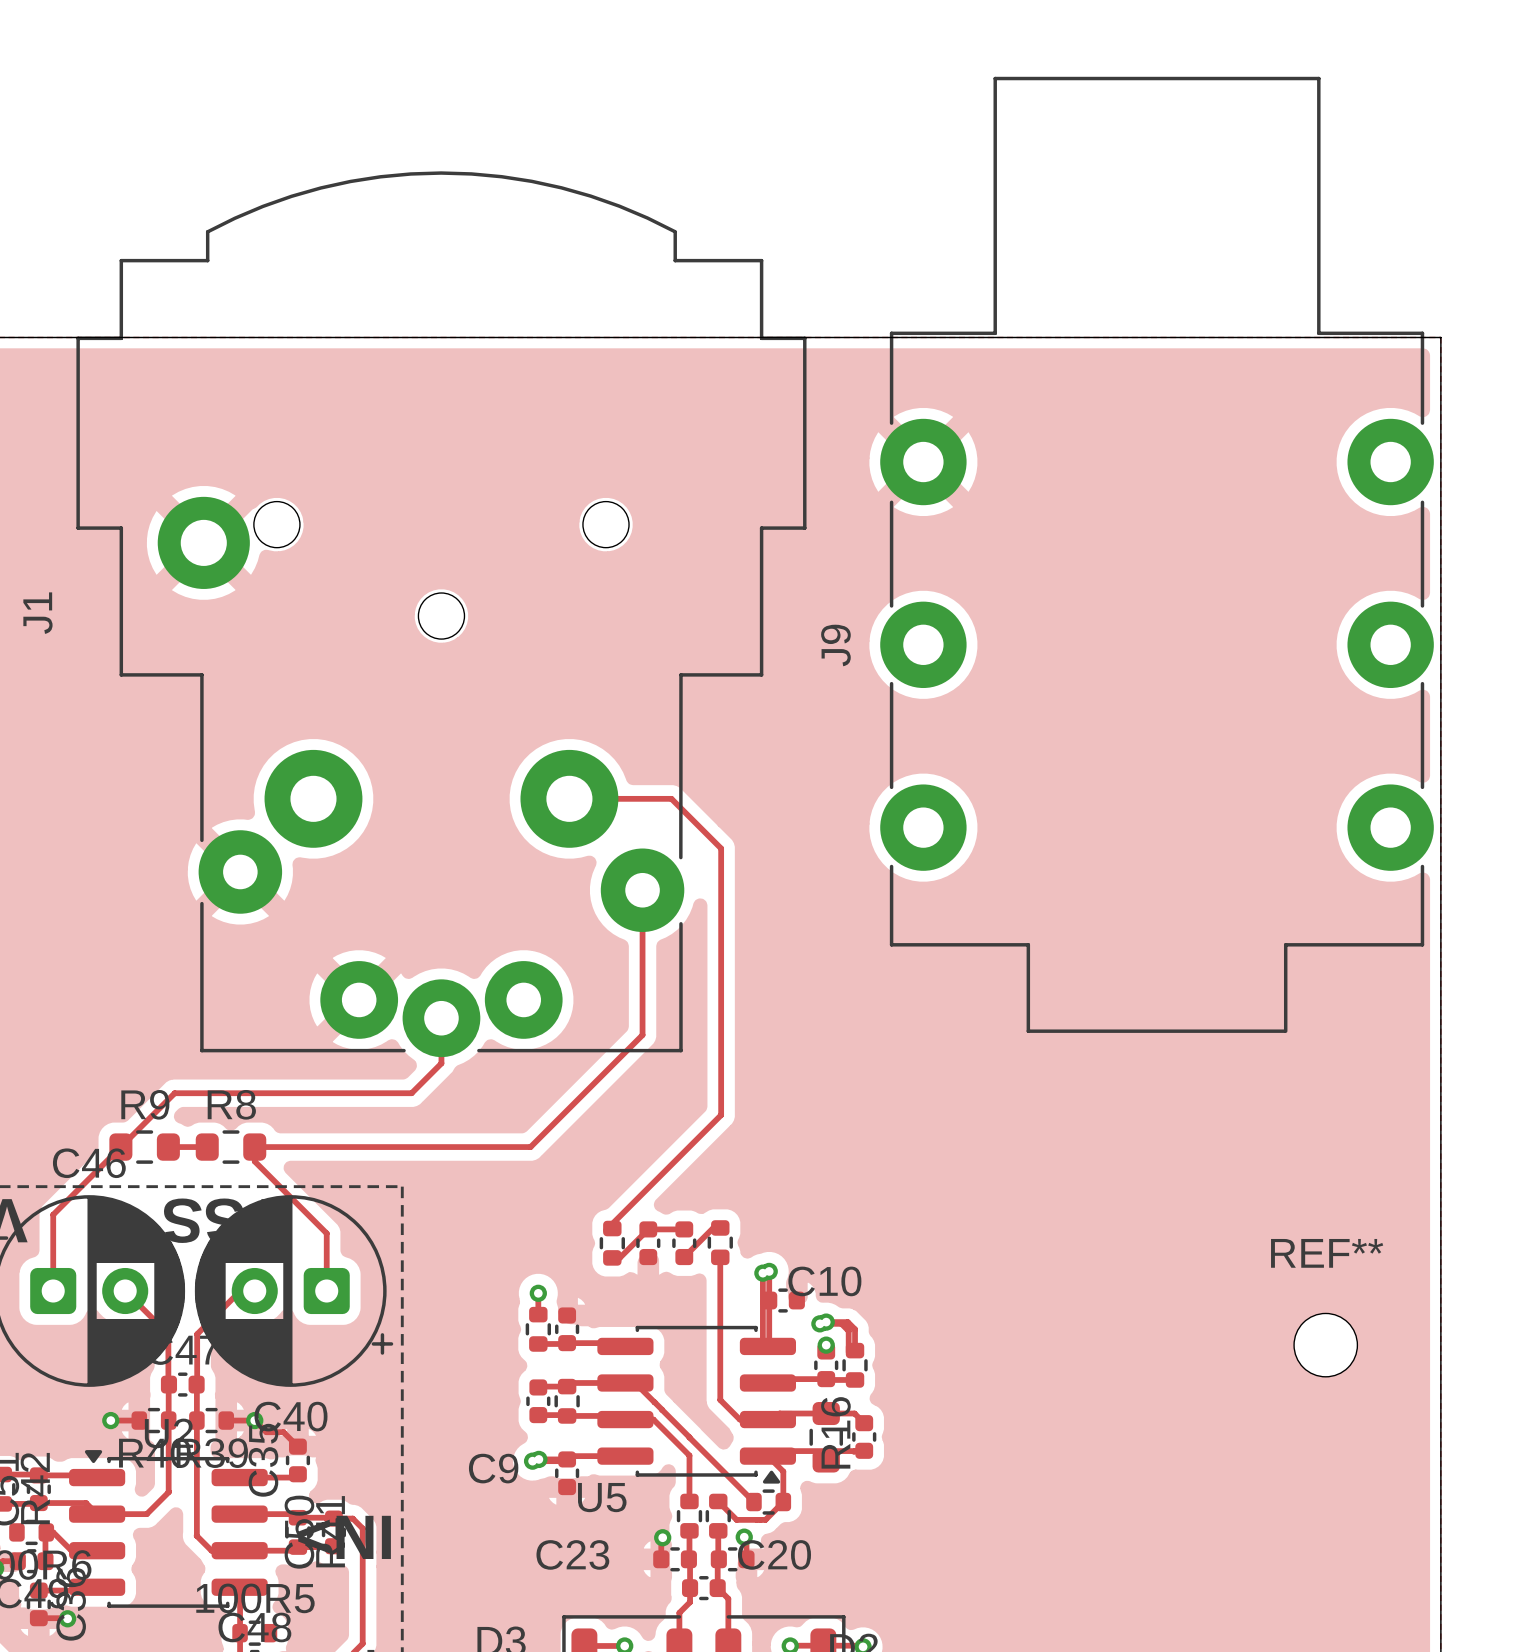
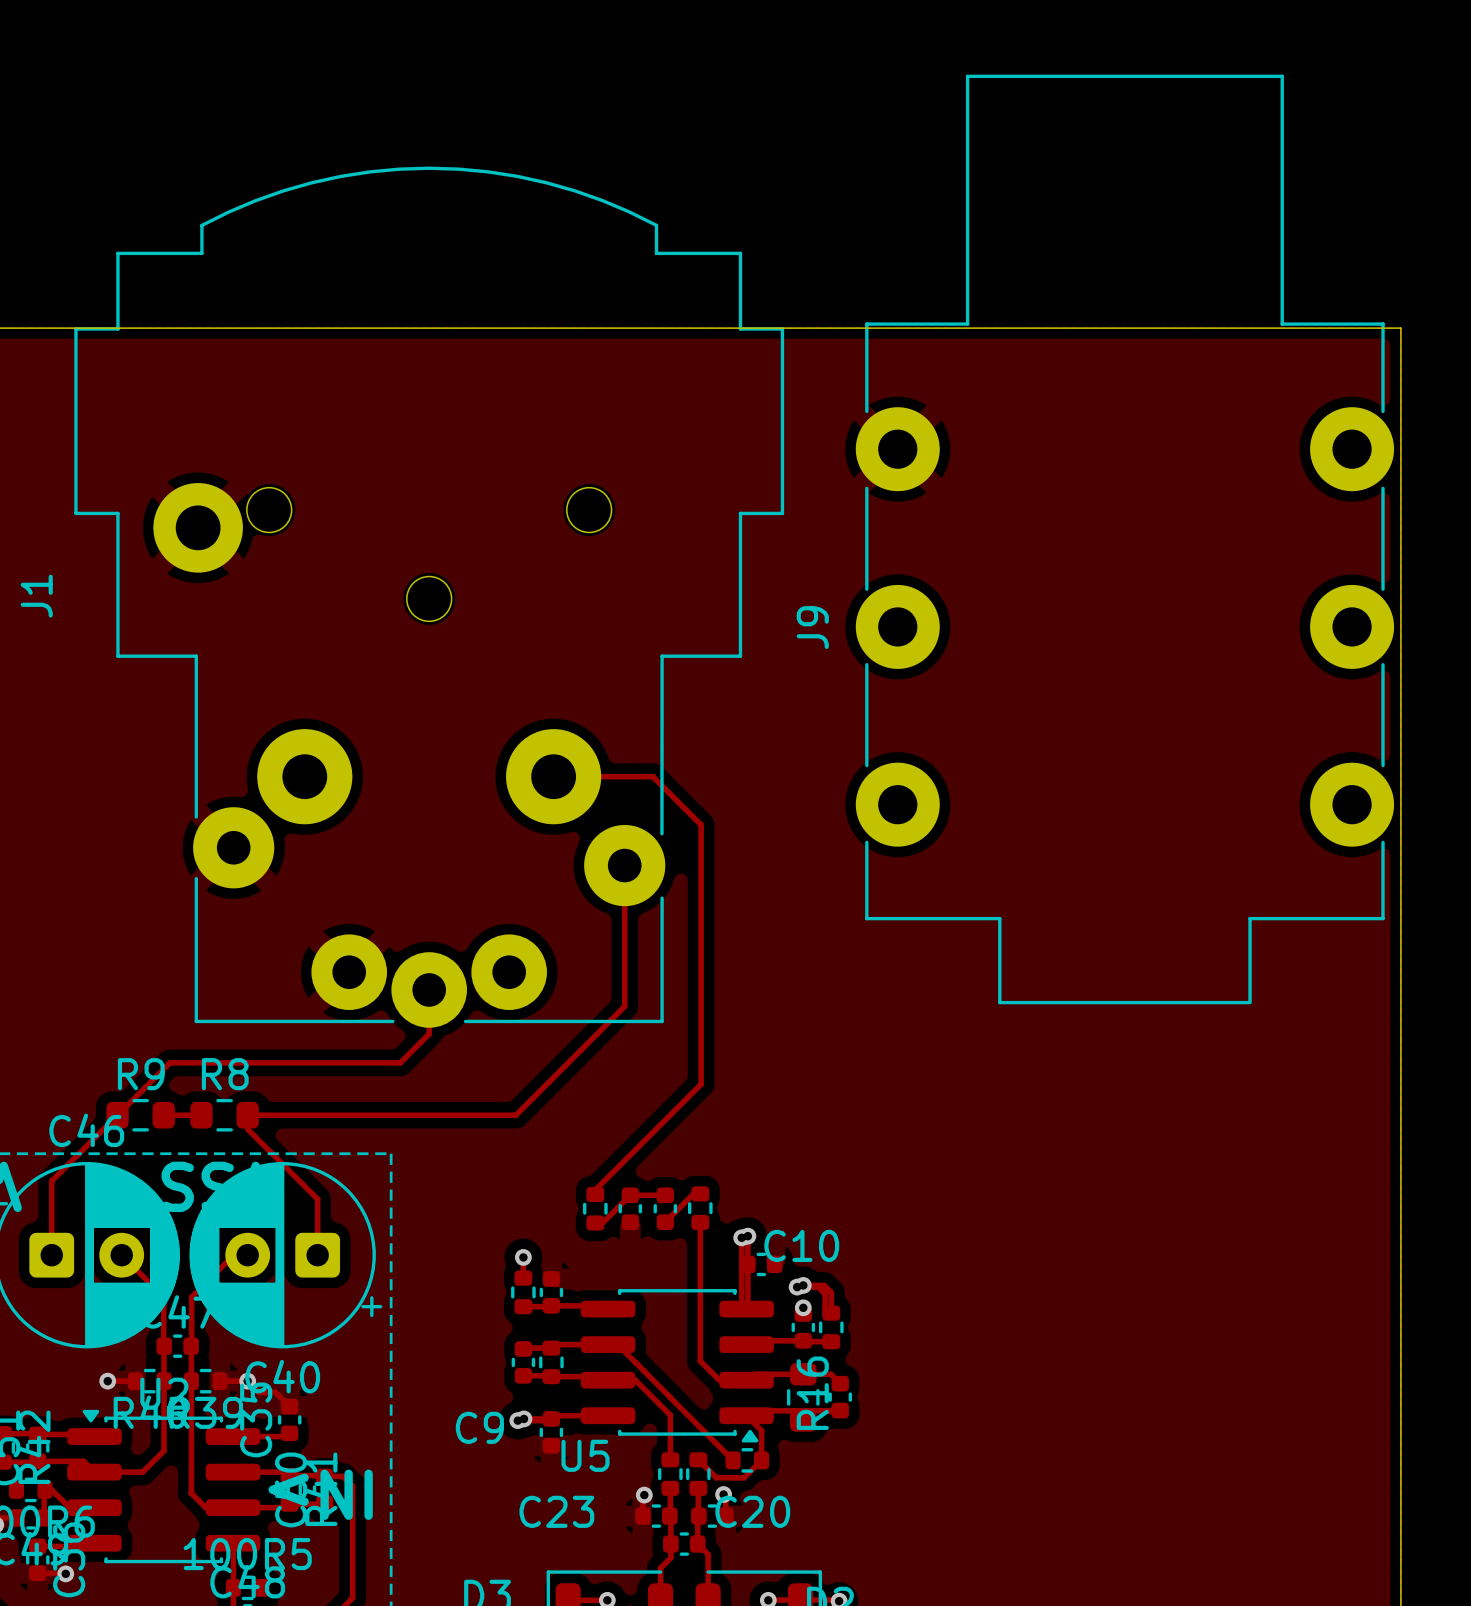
REF**: (1325, 1345) -> none

